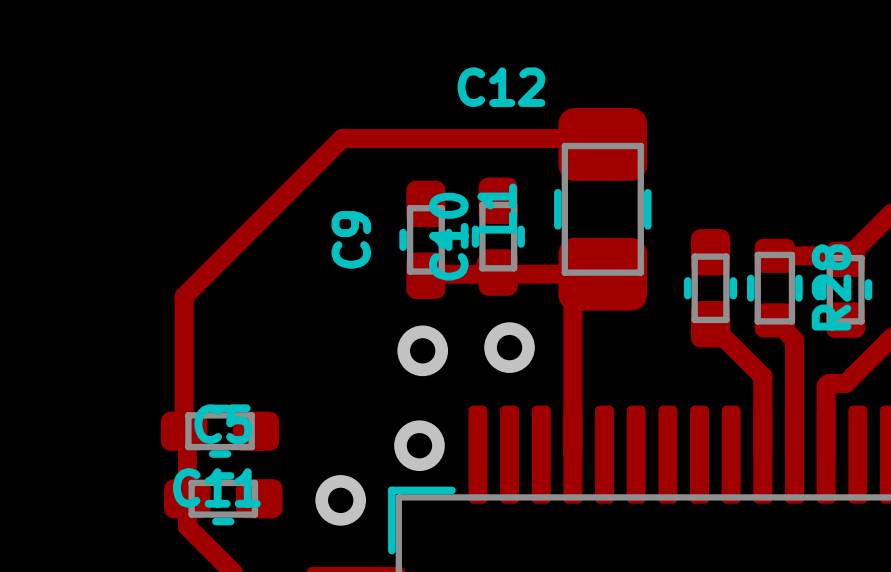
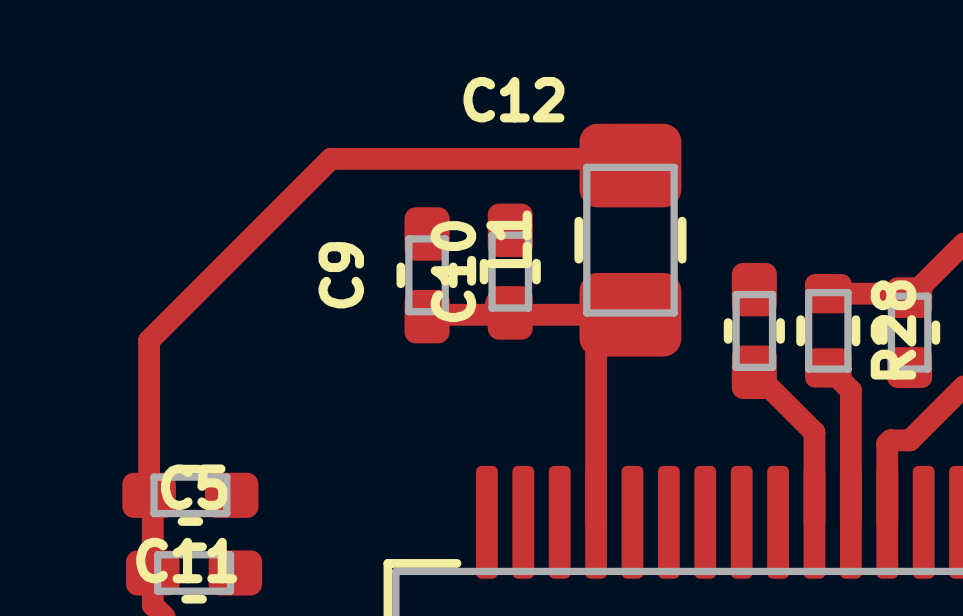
via: (509, 347) -> none
via: (422, 350) -> none
via: (419, 445) -> none
via: (340, 500) -> none

